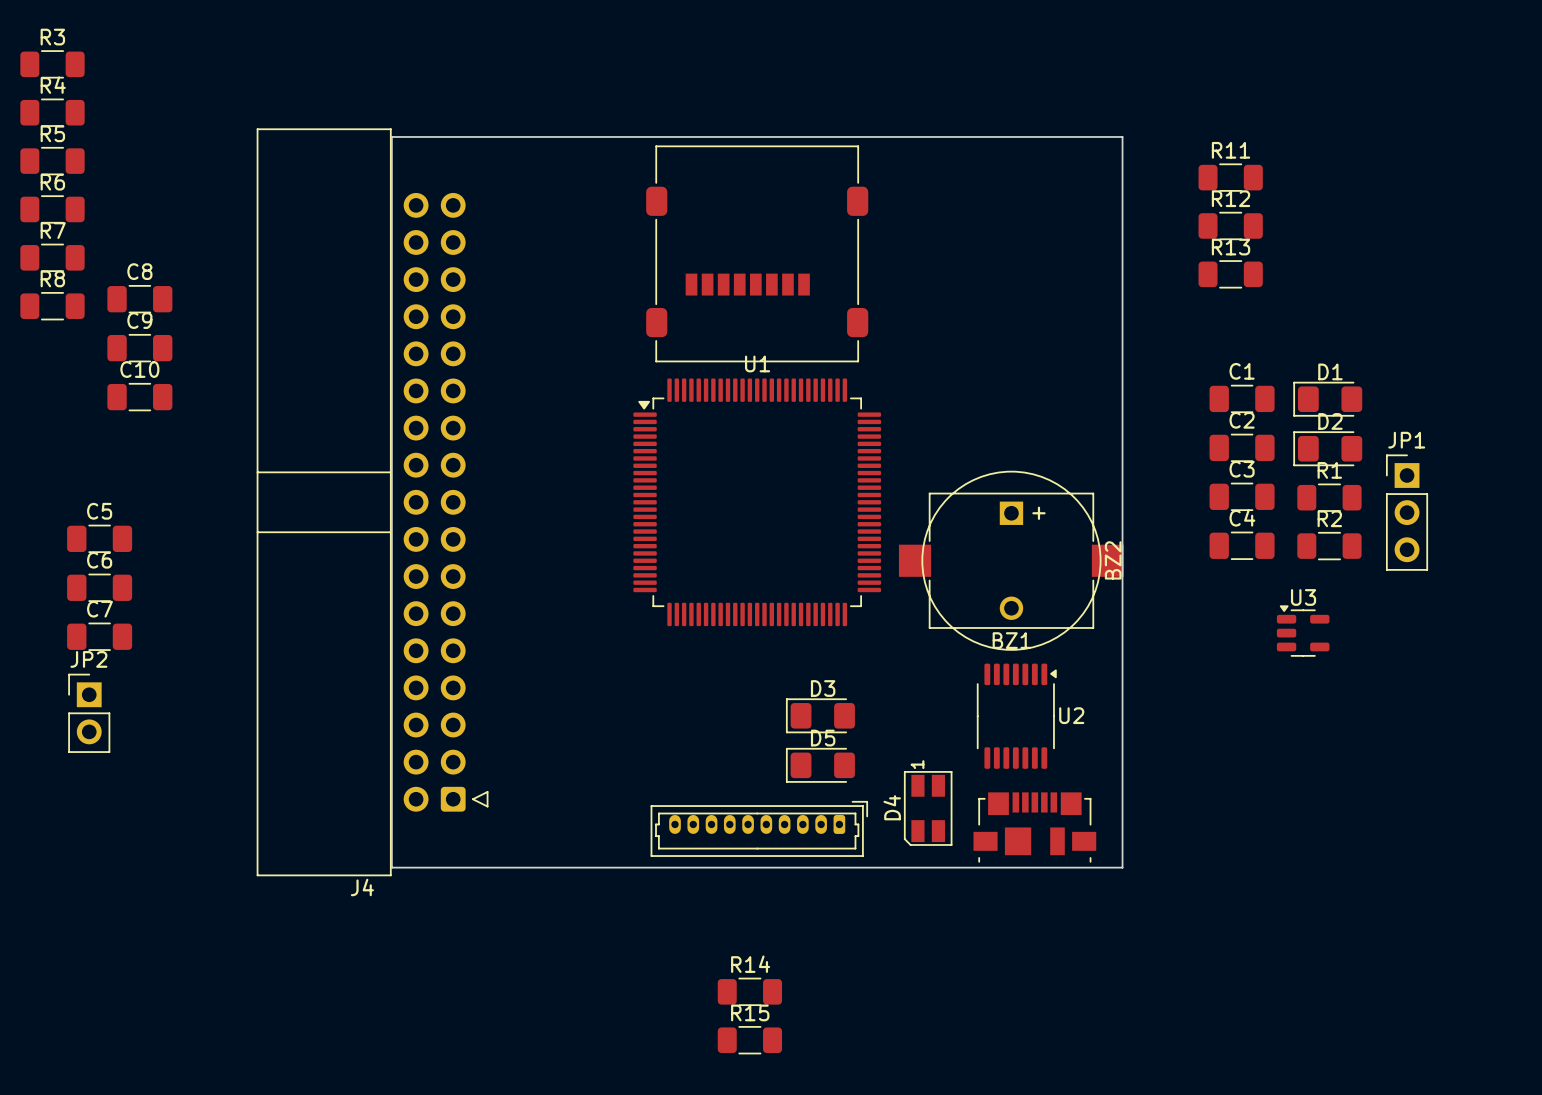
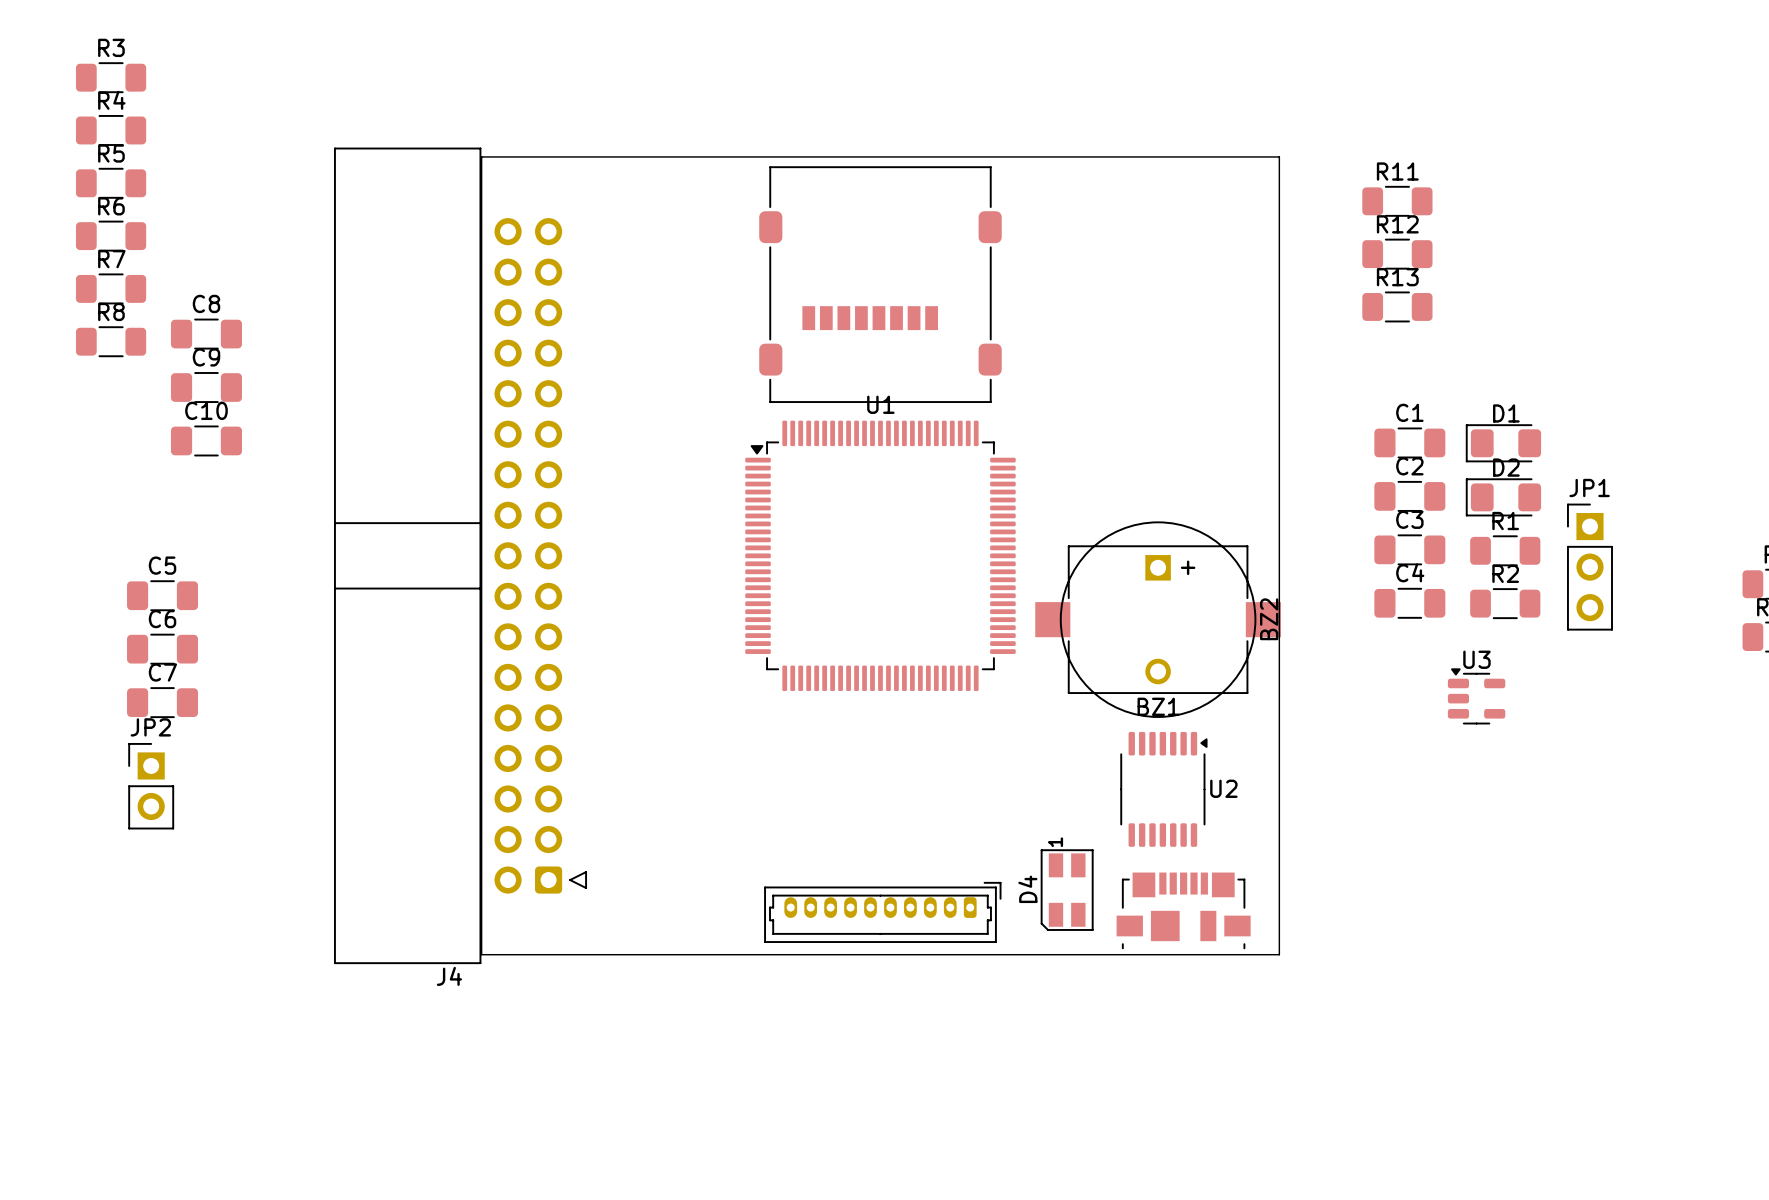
D3: (820, 715) -> none
D5: (820, 765) -> none
R14: (749, 991) -> none
R15: (749, 1040) -> none

